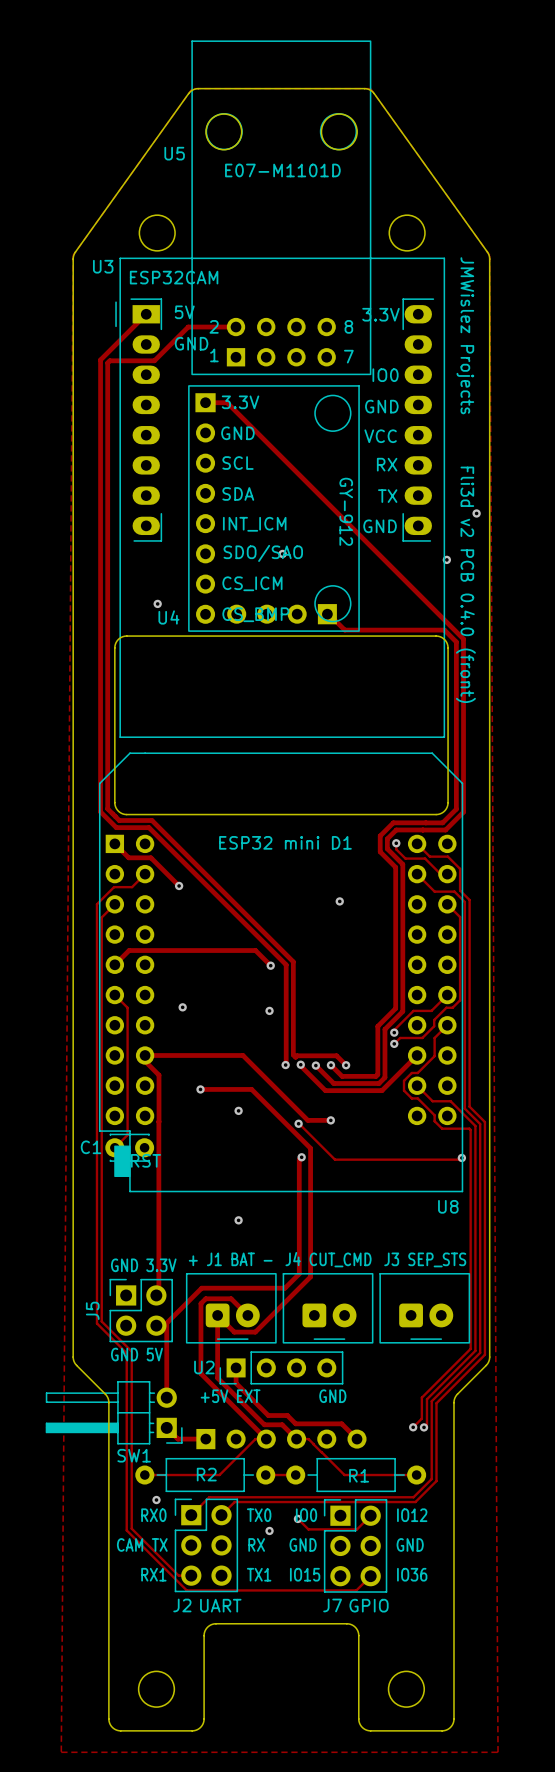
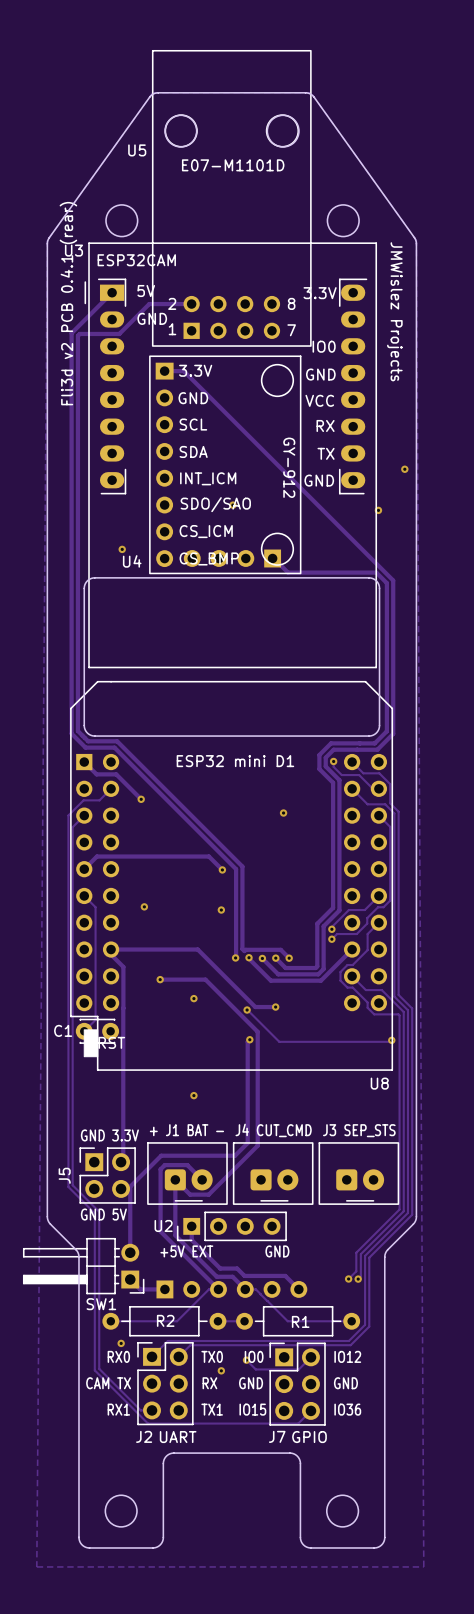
text: none -> Fli3d v2 PCB 0.4.1 (rear) (68, 303)
text: Fli3d v2 PCB 0.4.0 (front) (465, 584) -> none

